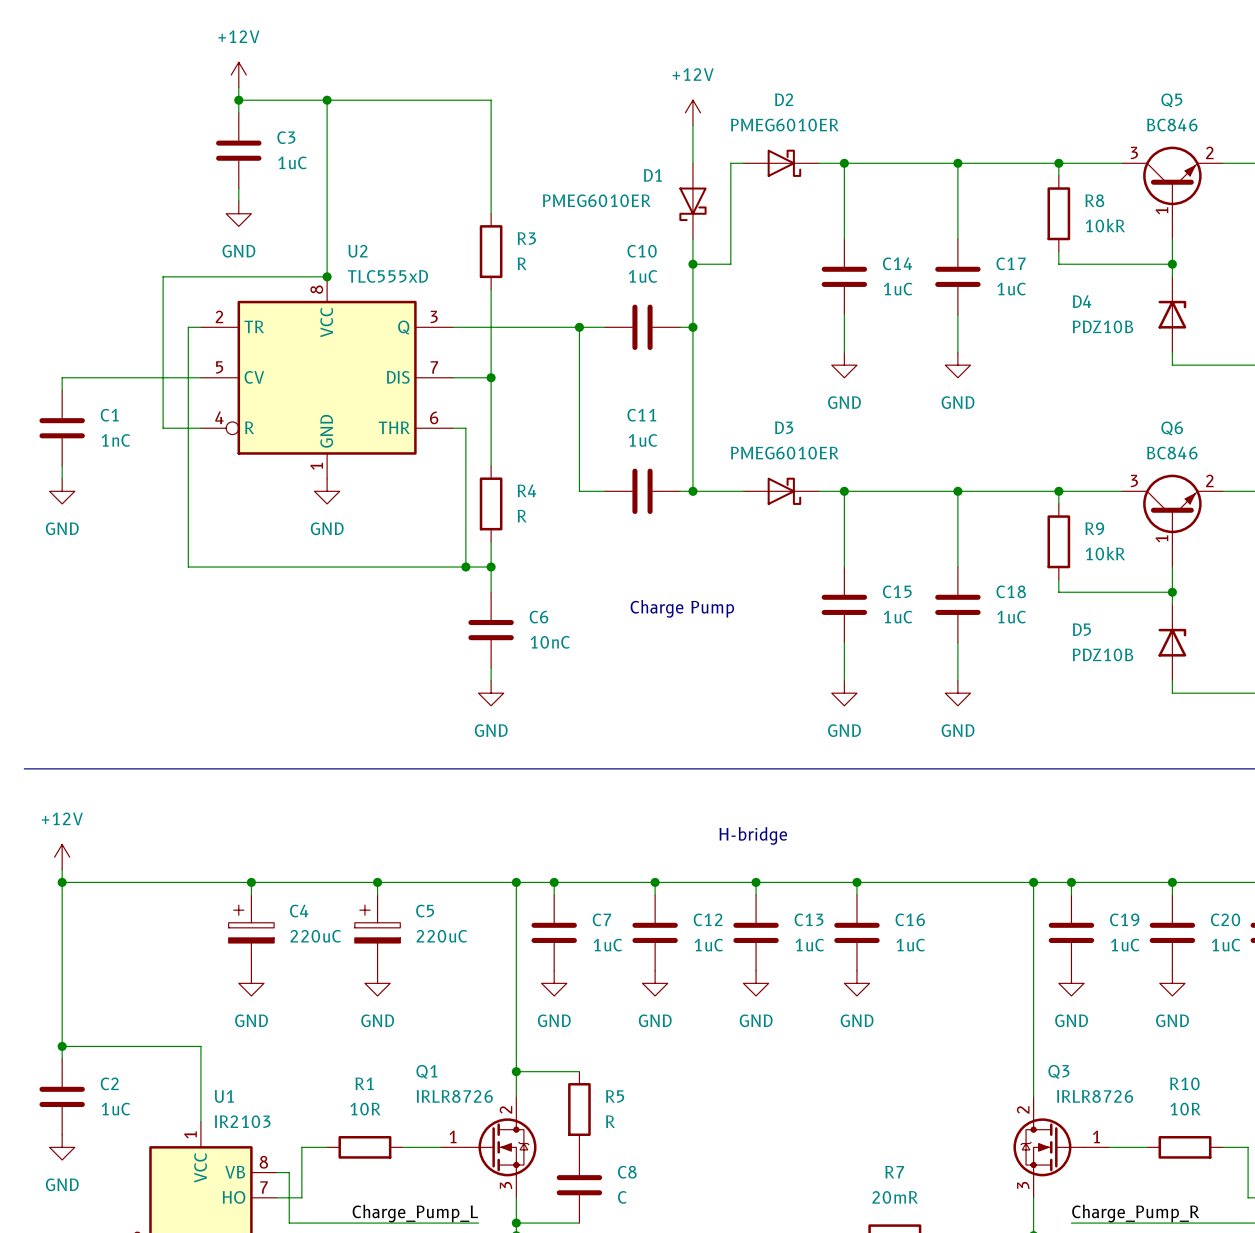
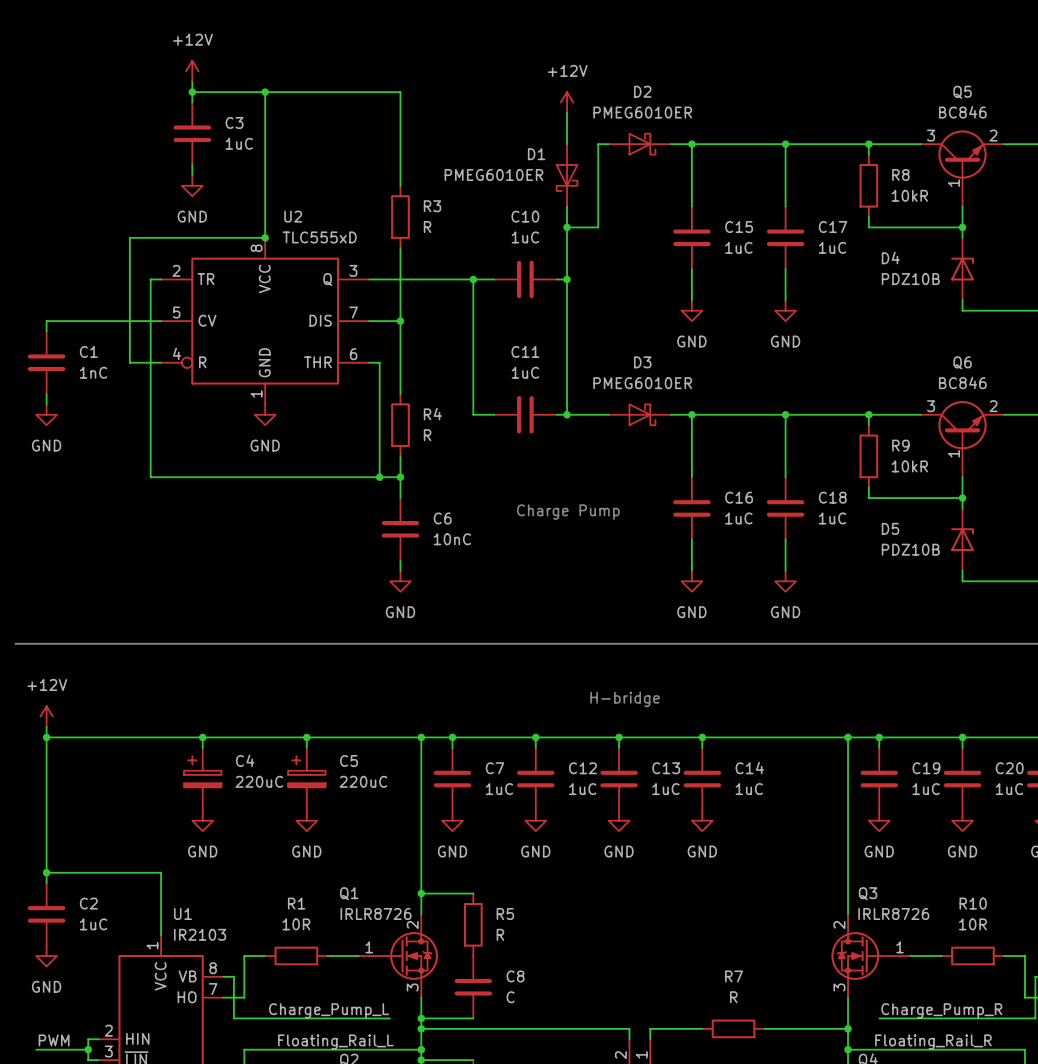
C14 name: C14 (897, 263) -> C15 (739, 227)
C15 name: C15 (897, 591) -> C16 (739, 497)
C16 name: C16 (910, 919) -> C14 (749, 768)
R7 value: 20mR (895, 1197) -> R (733, 997)

